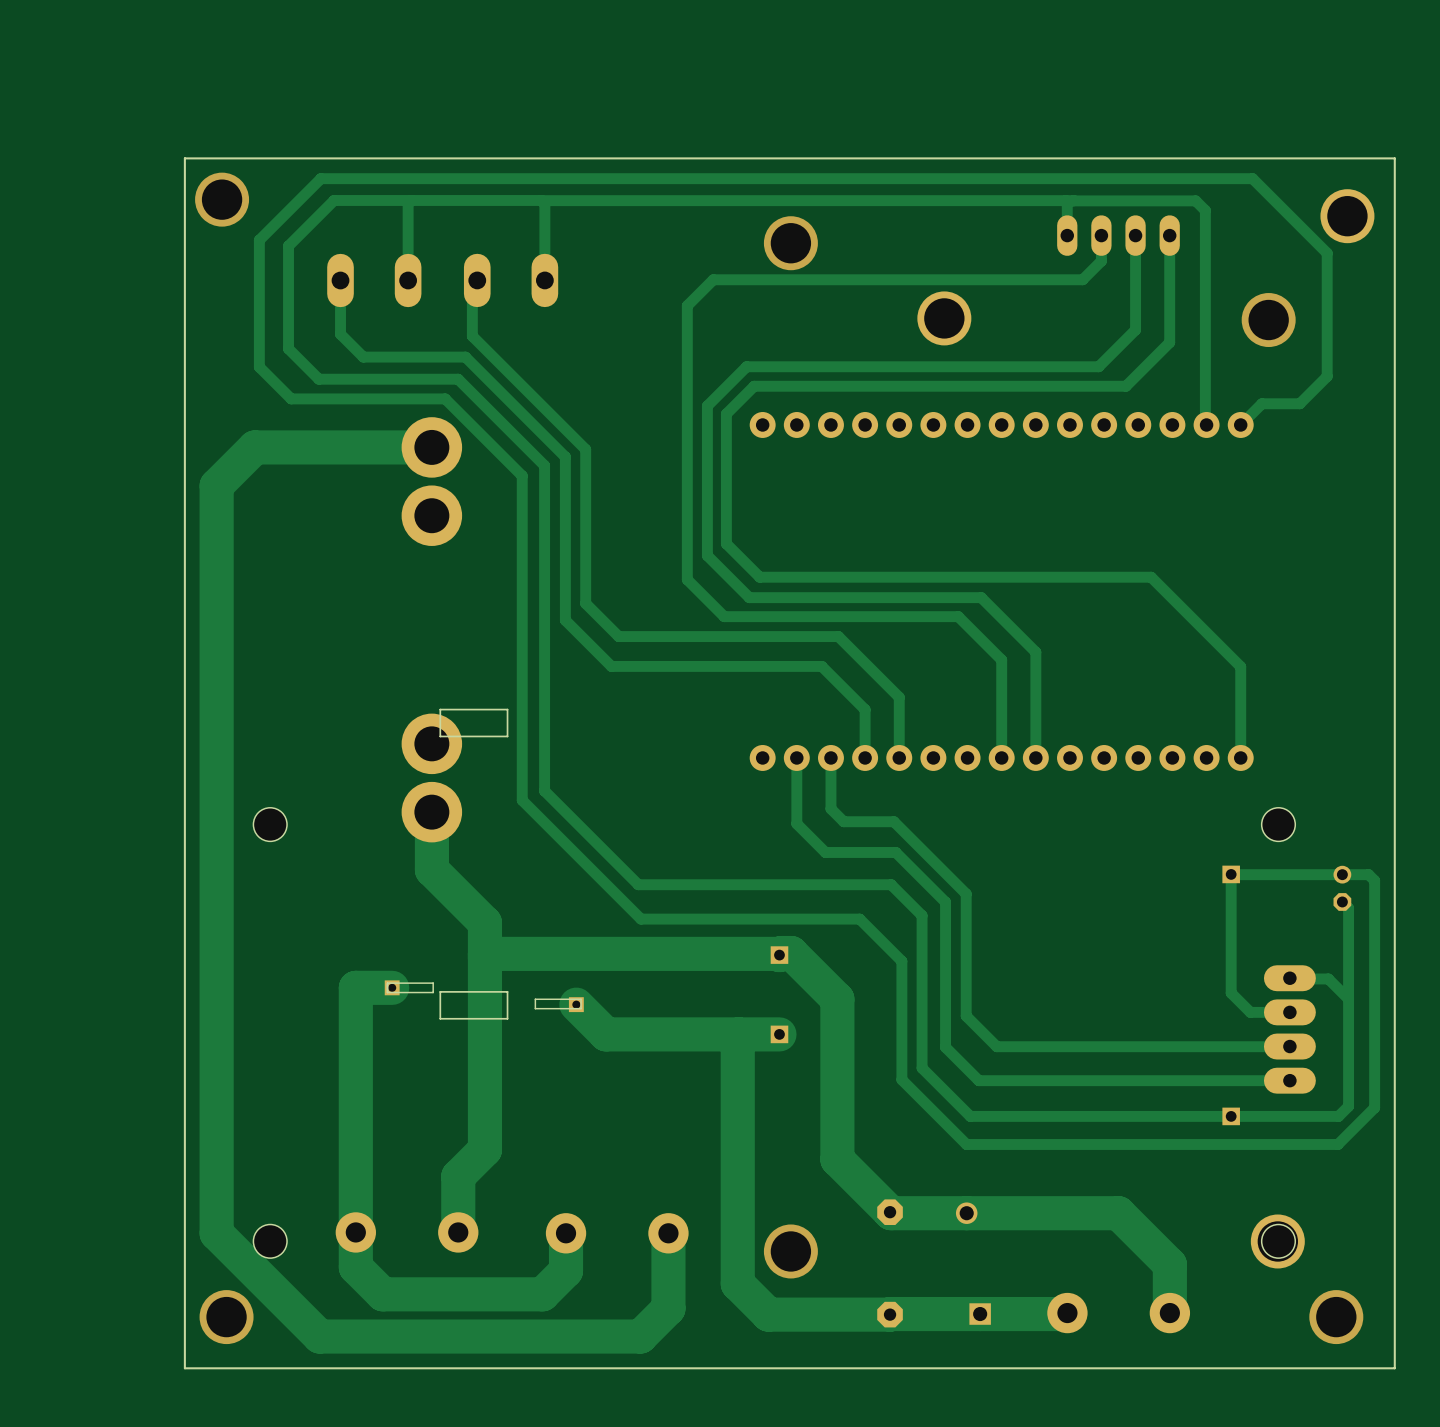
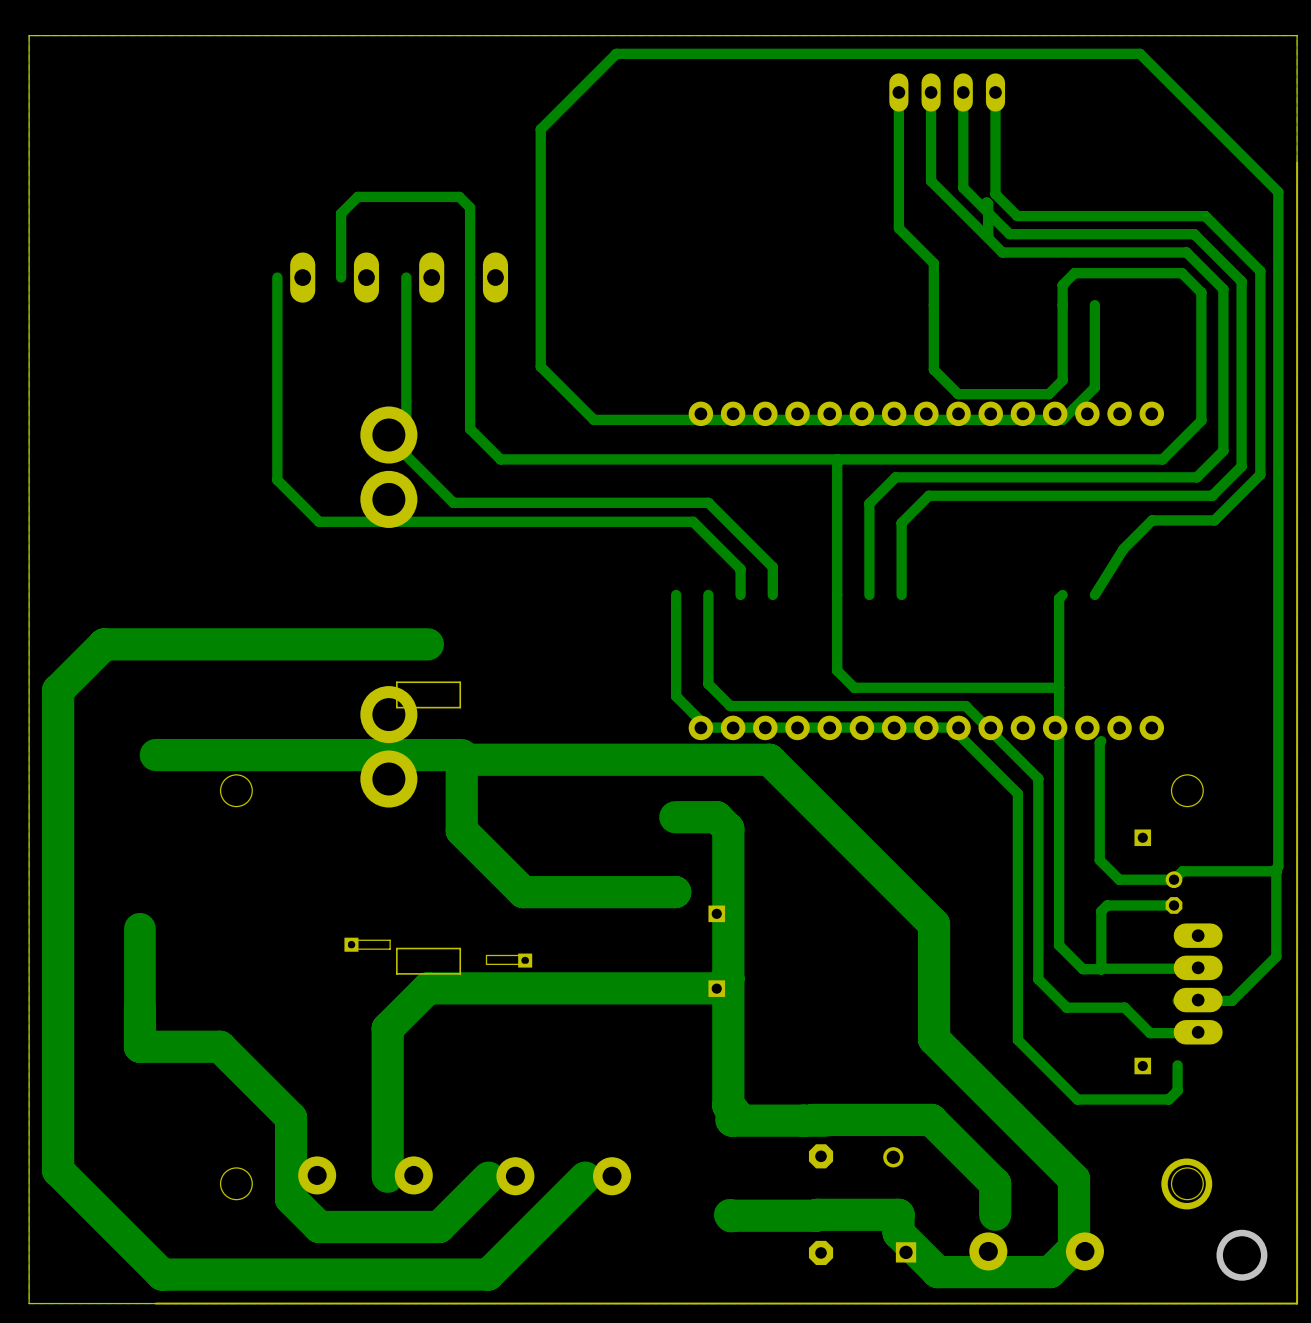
track: none -> (898, 92) (898, 228) (933, 263) (933, 369) (958, 394) (1048, 394) (1062, 380) (1062, 285) (1074, 273) (1182, 273) (1201, 292) (1201, 420) (1162, 459) (500, 459) (470, 429) (470, 207) (459, 196) (357, 196) (341, 213) (341, 277)
track: none -> (931, 92) (931, 181) (1002, 252) (1186, 252) (1223, 289) (1223, 450) (1196, 477) (895, 477) (869, 503) (869, 594)
track: none -> (963, 92) (963, 187) (1009, 234) (1194, 234) (1241, 281) (1241, 466) (1212, 495) (928, 495) (901, 522) (901, 594)
track: none -> (995, 92) (995, 194) (1017, 216) (1205, 216) (1260, 271) (1260, 474) (1214, 520) (1152, 520) (1123, 549) (1094, 594)
board edge: (1394, 158) (184, 158) (184, 1368) -> (1297, 162) (1297, 35) (29, 35) (29, 1303) (155, 1303)
via: (222, 199) -> none
track: (411, 200) (408, 203) (408, 280) -> none
track: (541, 200) (1195, 200) (1205, 210) (1206, 424) -> none
part: (1347, 216) -> none
track: (1101, 235) (1101, 261) (1082, 279) (713, 279) (687, 305) (687, 579) (724, 616) (958, 616) (1001, 660) (1001, 757) -> none
part position: (1118, 235) -> (947, 92)
track: (1135, 235) (1135, 329) (1098, 366) (746, 366) (707, 405) (707, 555) (749, 597) (981, 597) (1035, 652) (1035, 757) -> none
track: (1169, 235) (1169, 342) (1126, 386) (754, 386) (726, 413) (726, 543) (759, 577) (1151, 577) (1240, 666) (1240, 757) -> none
via: (790, 243) -> none
track: none -> (277, 277) (277, 480) (319, 521) (693, 521) (740, 569) (740, 594)
track: (340, 280) (340, 334) (363, 357) (465, 357) (565, 456) (565, 620) (611, 666) (821, 666) (865, 709) (865, 757) -> none
track: none -> (406, 277) (406, 455) (453, 502) (708, 502) (772, 567) (772, 594)
track: (477, 280) (472, 285) (472, 336) (585, 449) (585, 603) (618, 636) (838, 636) (899, 697) (899, 757) -> none
track: (544, 280) (544, 203) (541, 200) (334, 200) (288, 246) (288, 348) (318, 379) (458, 379) (544, 465) (544, 790) (638, 884) (891, 884) (922, 915) (922, 1068) (970, 1116) (1338, 1116) (1348, 1106) (1348, 908) (1342, 901) -> none
track: none -> (1094, 305) (1094, 387) (1062, 419) (593, 419) (540, 366) (540, 129) (616, 53) (1140, 53) (1278, 192) (1278, 866) (1273, 871)
part: (944, 318) -> none
via: (1268, 320) -> none
track: (1240, 424) (1261, 403) (1299, 403) (1327, 376) (1327, 253) (1252, 178) (320, 178) (259, 240) (259, 367) (291, 398) (445, 398) (522, 475) (522, 800) (641, 919) (859, 919) (901, 961) (901, 1079) (966, 1144) (1337, 1144) (1374, 1107) (1374, 880) (1368, 874) (1231, 874) (1231, 993) (1250, 1012) (1289, 1012) -> none
track: (431, 447) (254, 447) (216, 485) (216, 1233) (319, 1336) (640, 1336) (668, 1308) (668, 1233) -> none
track: none -> (837, 459) (837, 670) (854, 687) (1059, 687)
track: none -> (676, 594) (676, 696) (707, 727) (951, 727) (1017, 793) (1017, 1040) (1077, 1099) (1168, 1099) (1177, 1090) (1177, 1065)
track: none -> (708, 594) (708, 684) (730, 706) (965, 706) (1038, 778) (1038, 979) (1066, 1007) (1124, 1007) (1150, 1033) (1177, 1033)
track: none -> (1062, 594) (1059, 598) (1059, 945) (1082, 969) (1101, 969)
track: none -> (427, 644) (104, 644) (58, 690) (58, 1170) (162, 1274) (488, 1274) (585, 1177)
track: (796, 757) (796, 823) (825, 852) (895, 852) (945, 902) (945, 1047) (978, 1080) (1289, 1080) -> none
track: (830, 757) (830, 808) (843, 821) (893, 821) (966, 893) (966, 1016) (996, 1046) (1289, 1046) -> none
track: none -> (1101, 741) (1099, 742) (1099, 860) (1119, 879) (1174, 879) (1182, 871) (1276, 871) (1276, 956) (1232, 1000) (1177, 1000)
track: none -> (461, 755) (155, 755)
track: (431, 812) (431, 869) (484, 922) (484, 1149) (458, 1176) (458, 1232) -> none
track: none -> (675, 817) (716, 817) (728, 828) (728, 1105) (734, 1112)
part position: (1342, 888) -> (1174, 892)
track: none -> (675, 892) (523, 892) (461, 830) (461, 759) (769, 759) (934, 924) (934, 1039) (1074, 1179) (1074, 1248) (1050, 1272) (937, 1272) (898, 1232) (898, 1214) (729, 1214)
track: none -> (1174, 905) (1107, 905) (1101, 911) (1101, 969) (1177, 968)
track: (484, 953) (779, 955) (781, 953) (791, 953) (837, 999) (837, 1159) (891, 1213) (1118, 1213) (1169, 1264) (1169, 1313) -> none
track: none -> (139, 928) (139, 1046) (219, 1046) (291, 1117) (291, 1198) (319, 1226) (439, 1226) (488, 1177)
track: (1289, 978) (1328, 978) (1348, 999) -> none
track: (392, 987) (355, 987) (355, 1267) (382, 1294) (542, 1294) (566, 1270) (566, 1233) -> none
track: (576, 1004) (606, 1034) (779, 1034) -> none
track: none -> (728, 978) (718, 988) (427, 988) (387, 1028) (387, 1176)
track: (738, 1034) (737, 1283) (768, 1314) (1067, 1313) -> none
track: none -> (731, 1119) (825, 1120)
track: none -> (812, 1119) (931, 1119) (995, 1183) (995, 1214)
via: (790, 1251) -> none
via: (226, 1317) -> none

